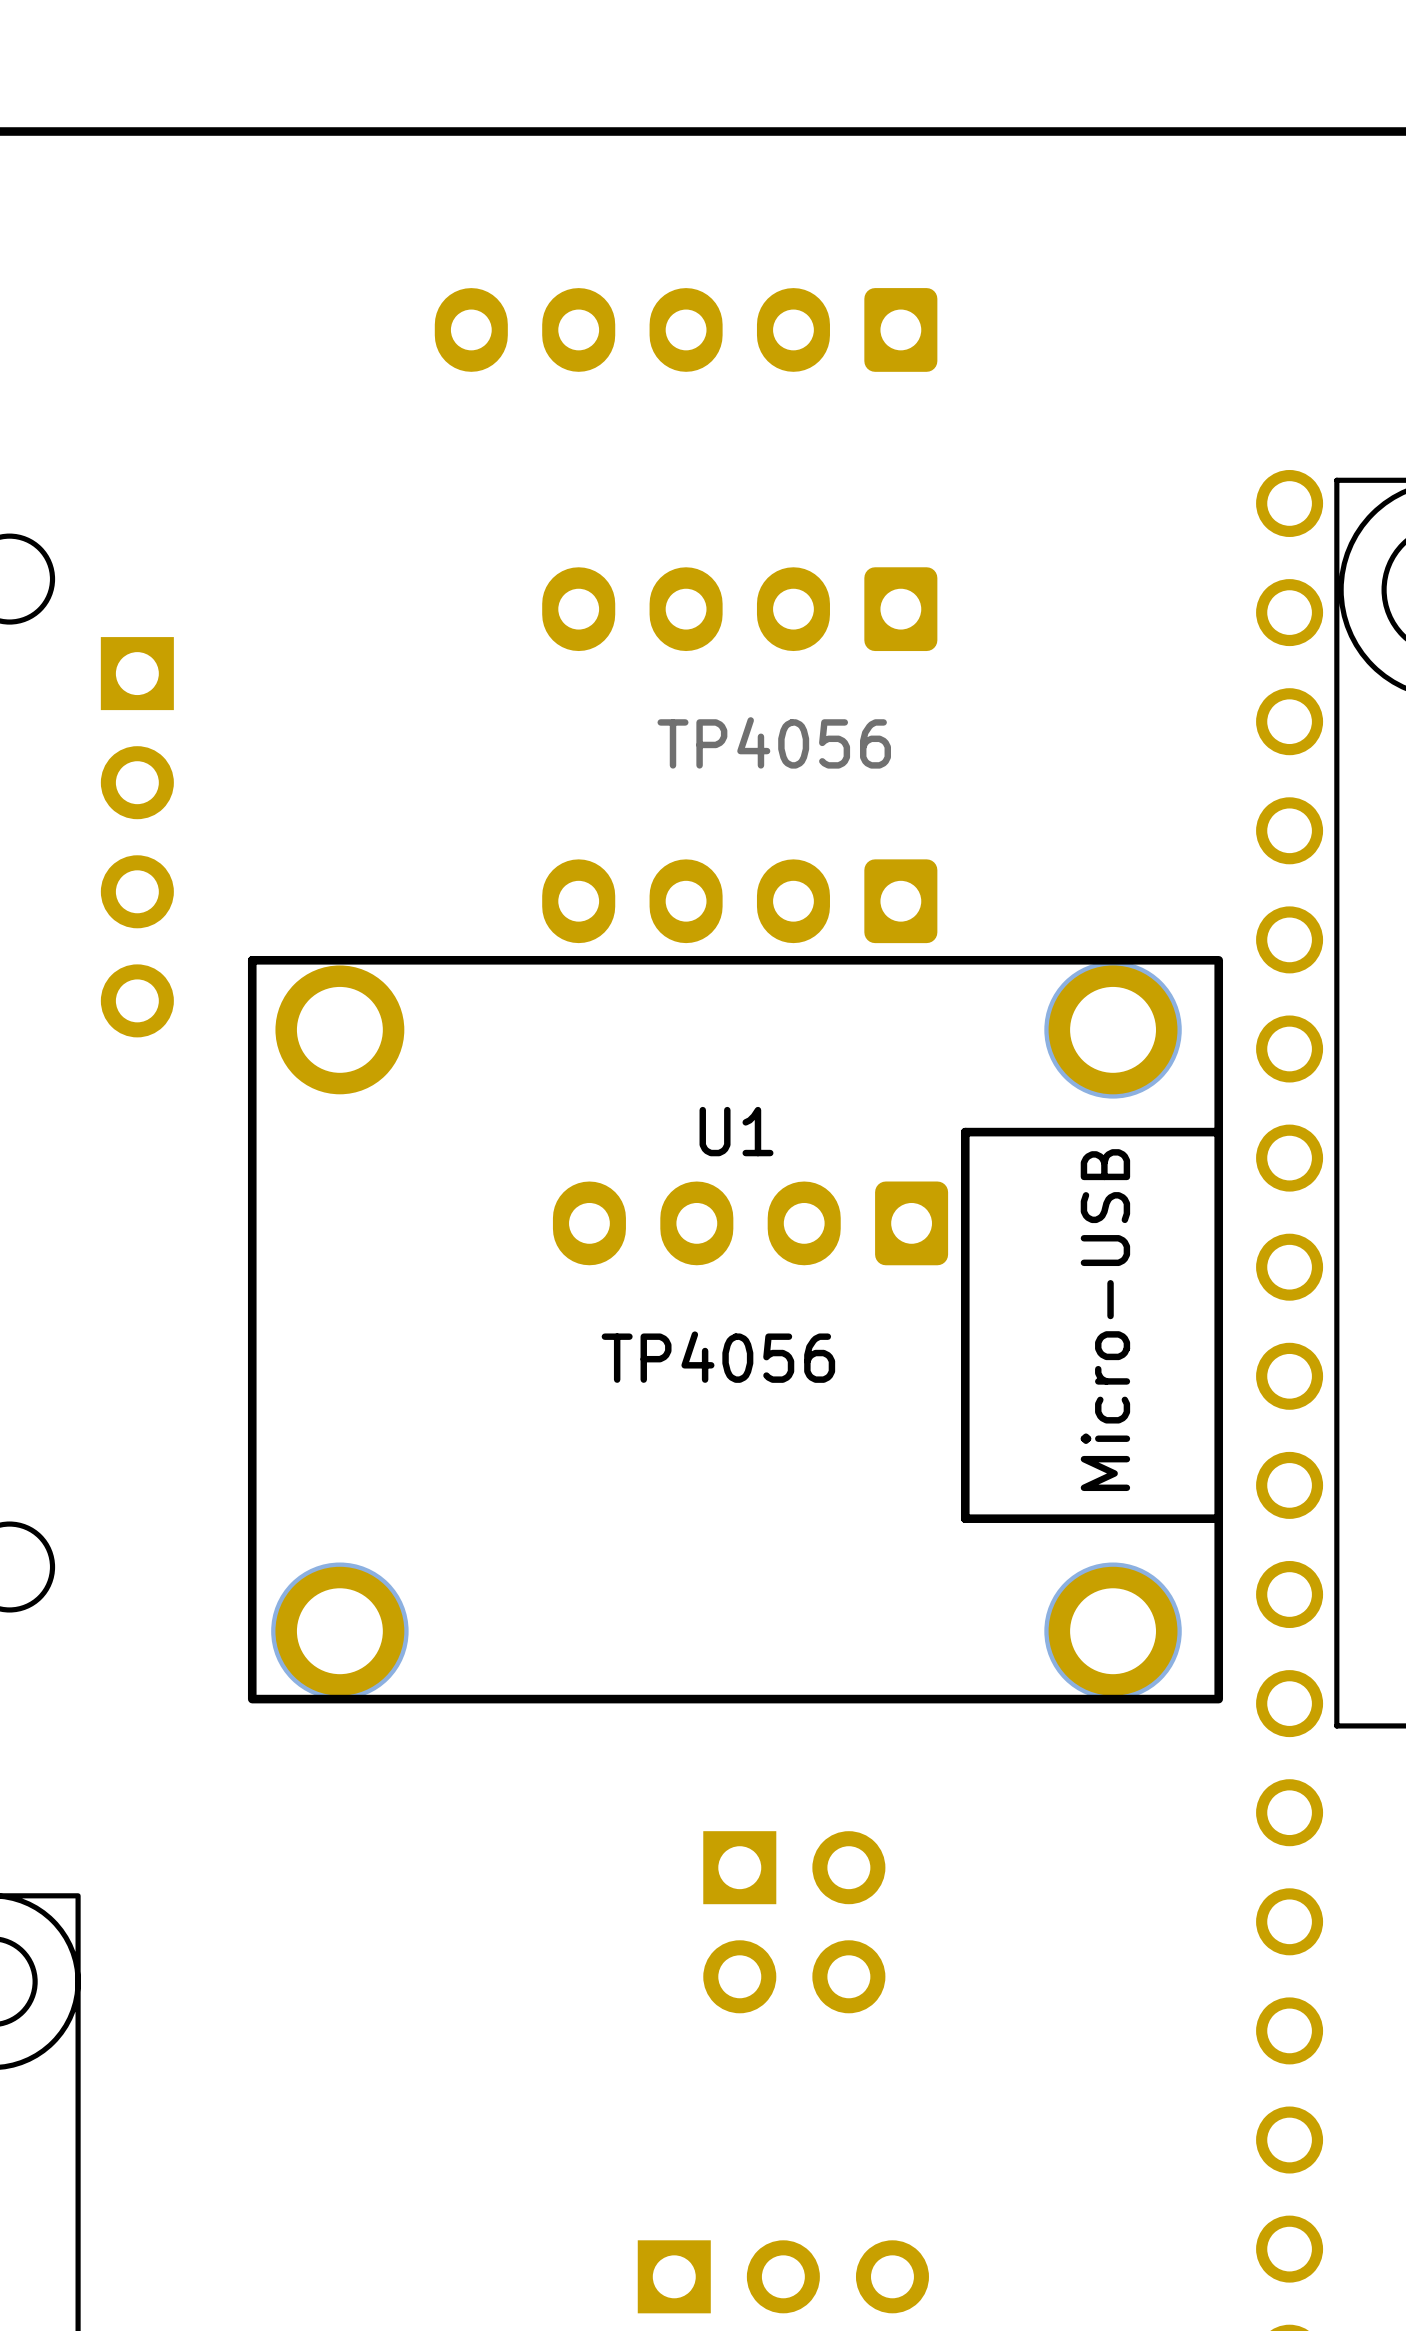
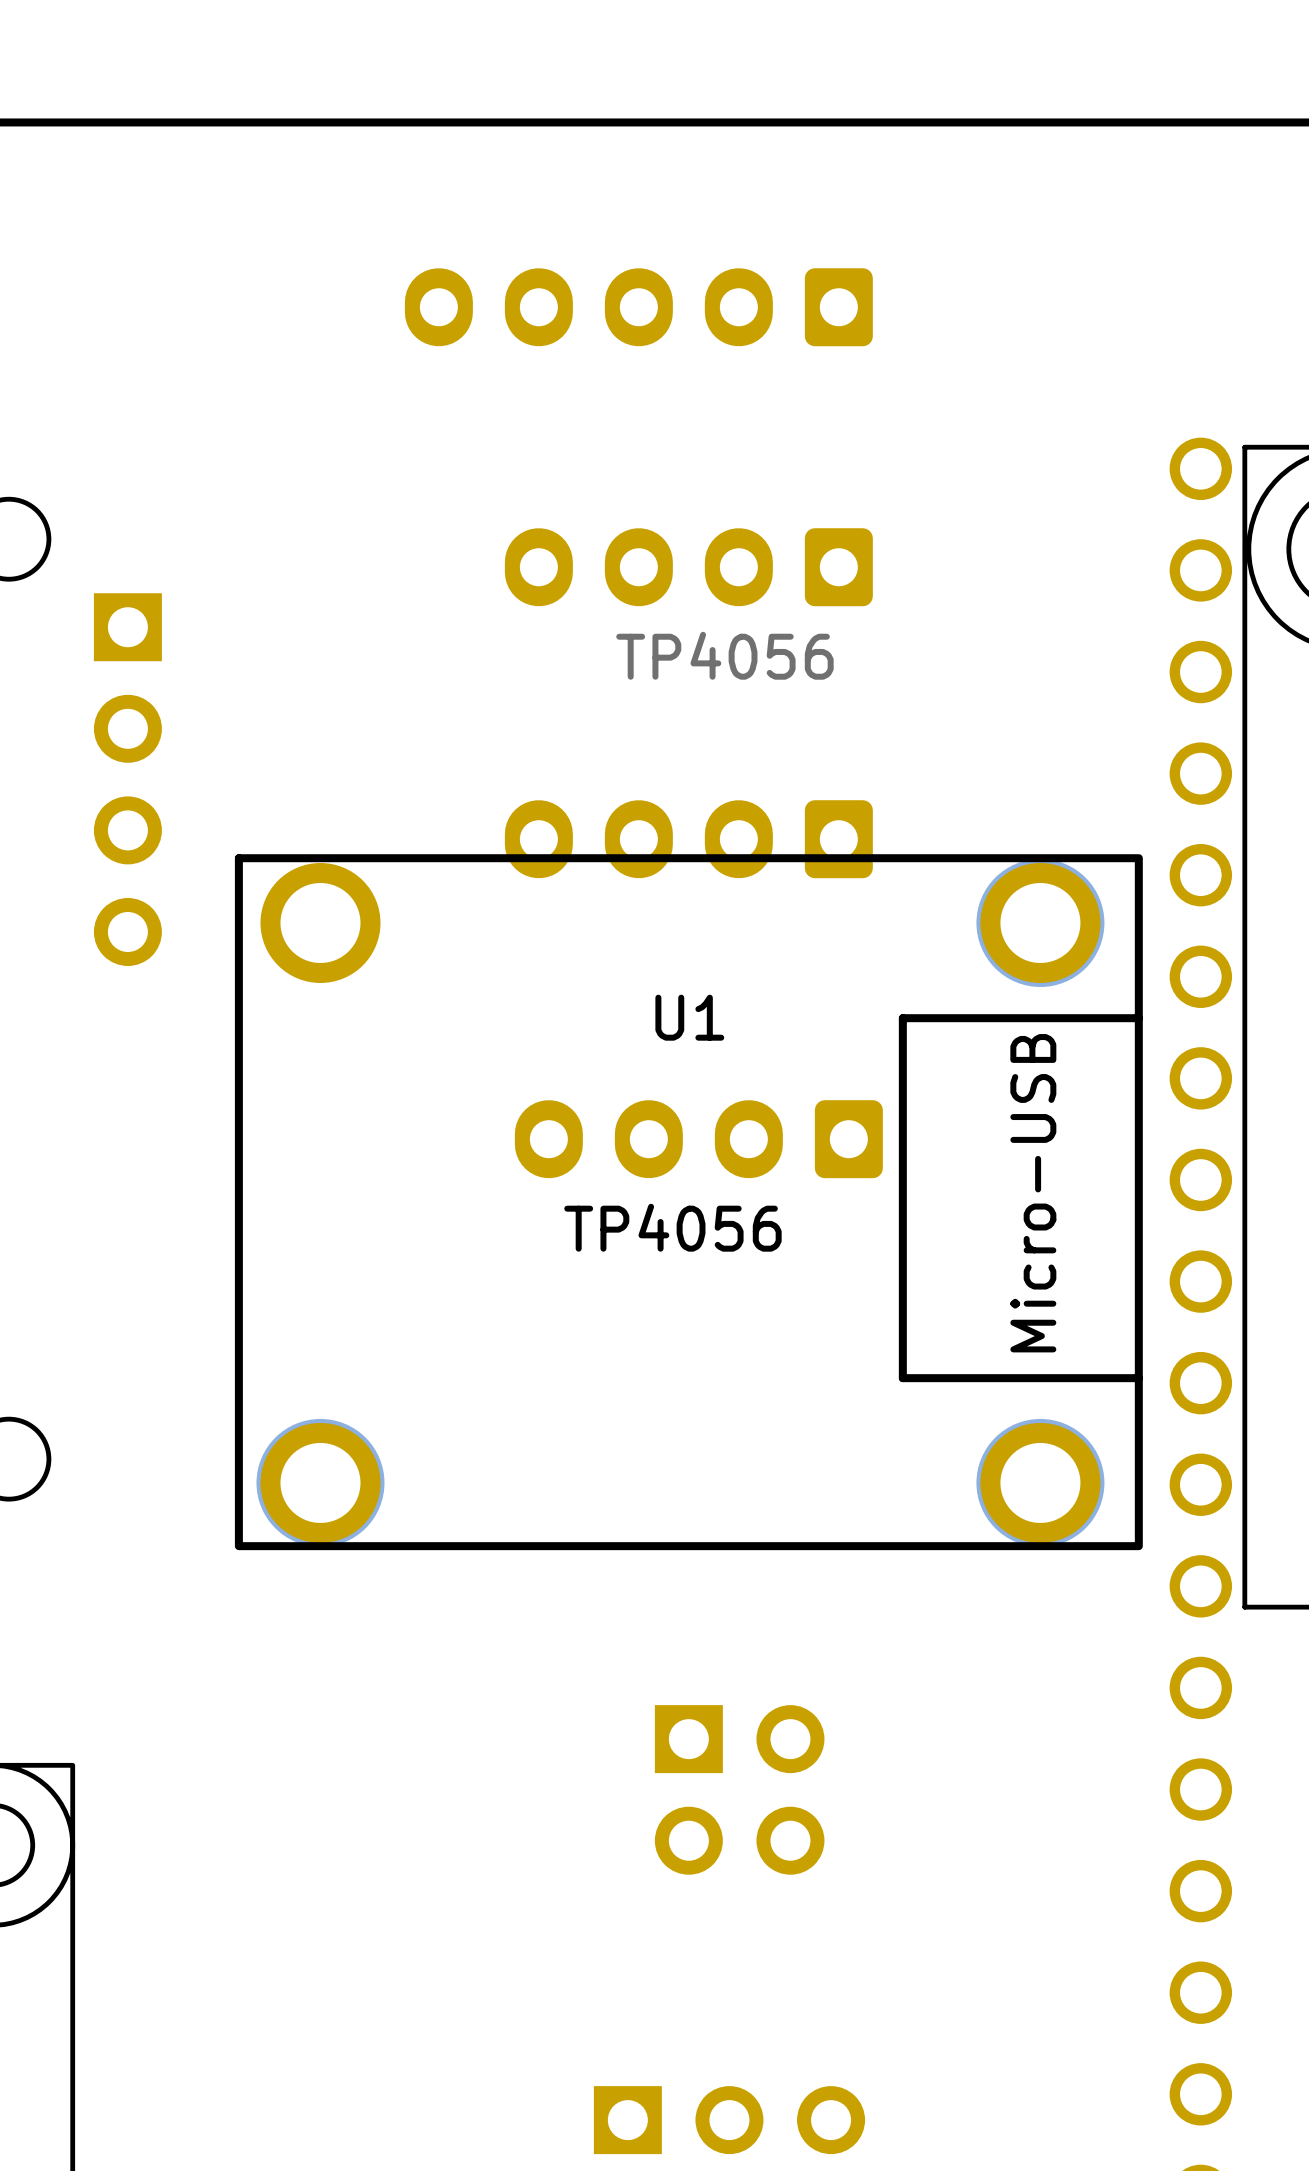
U1 position: (735, 1329) -> (688, 1202)

